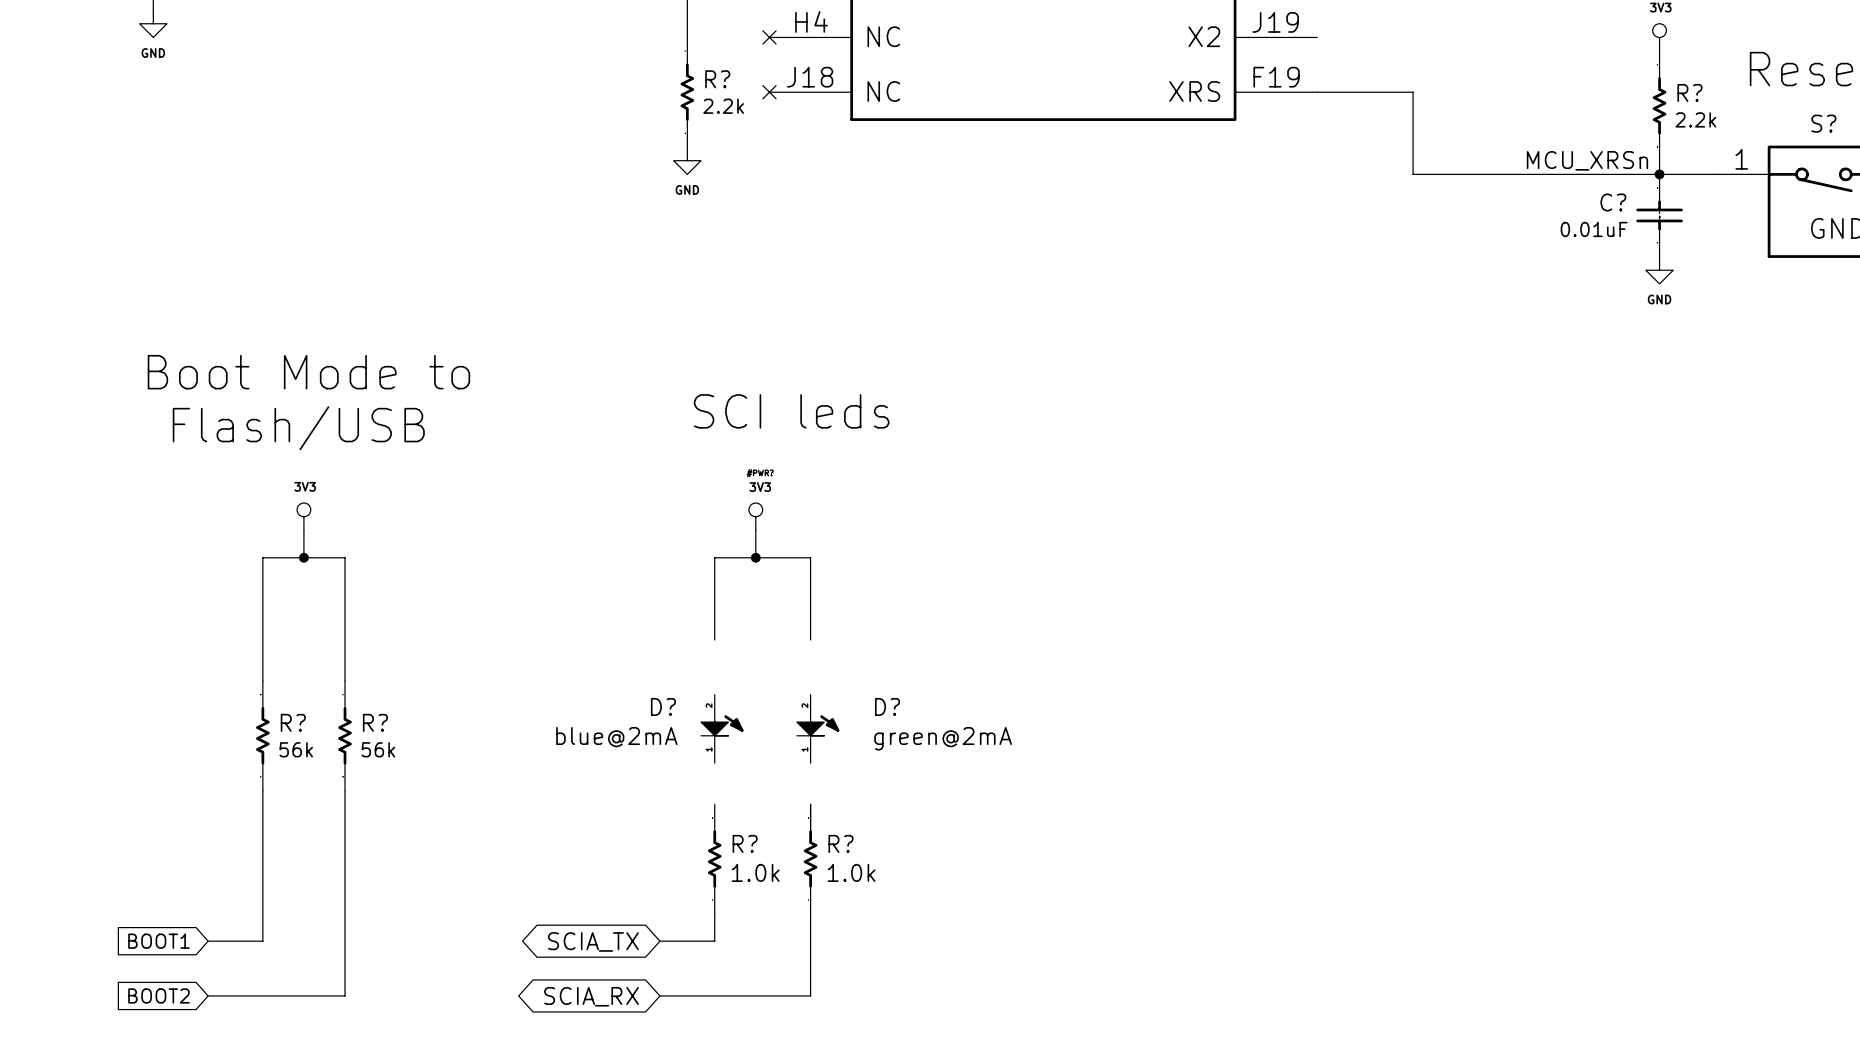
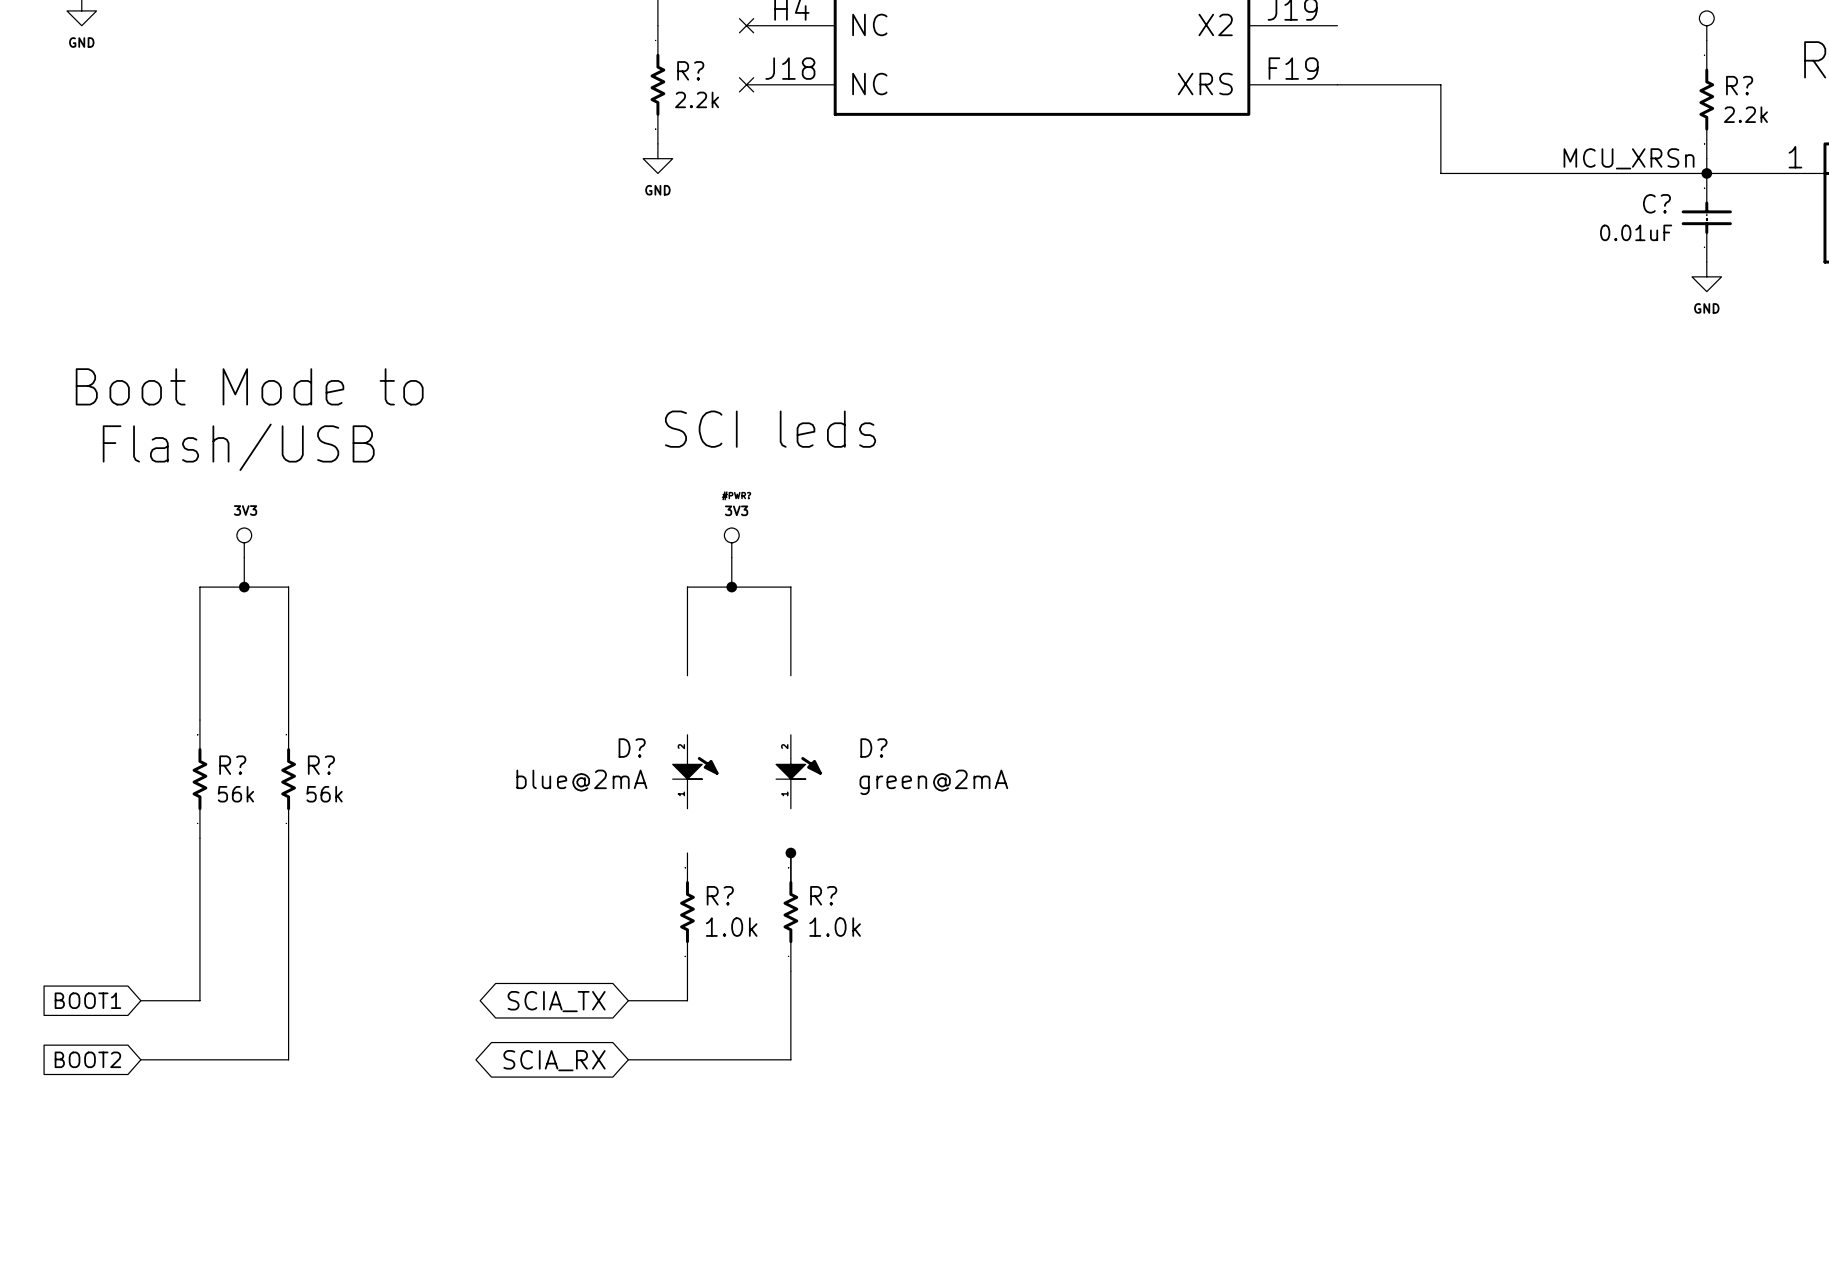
junction: none -> (790, 853)

